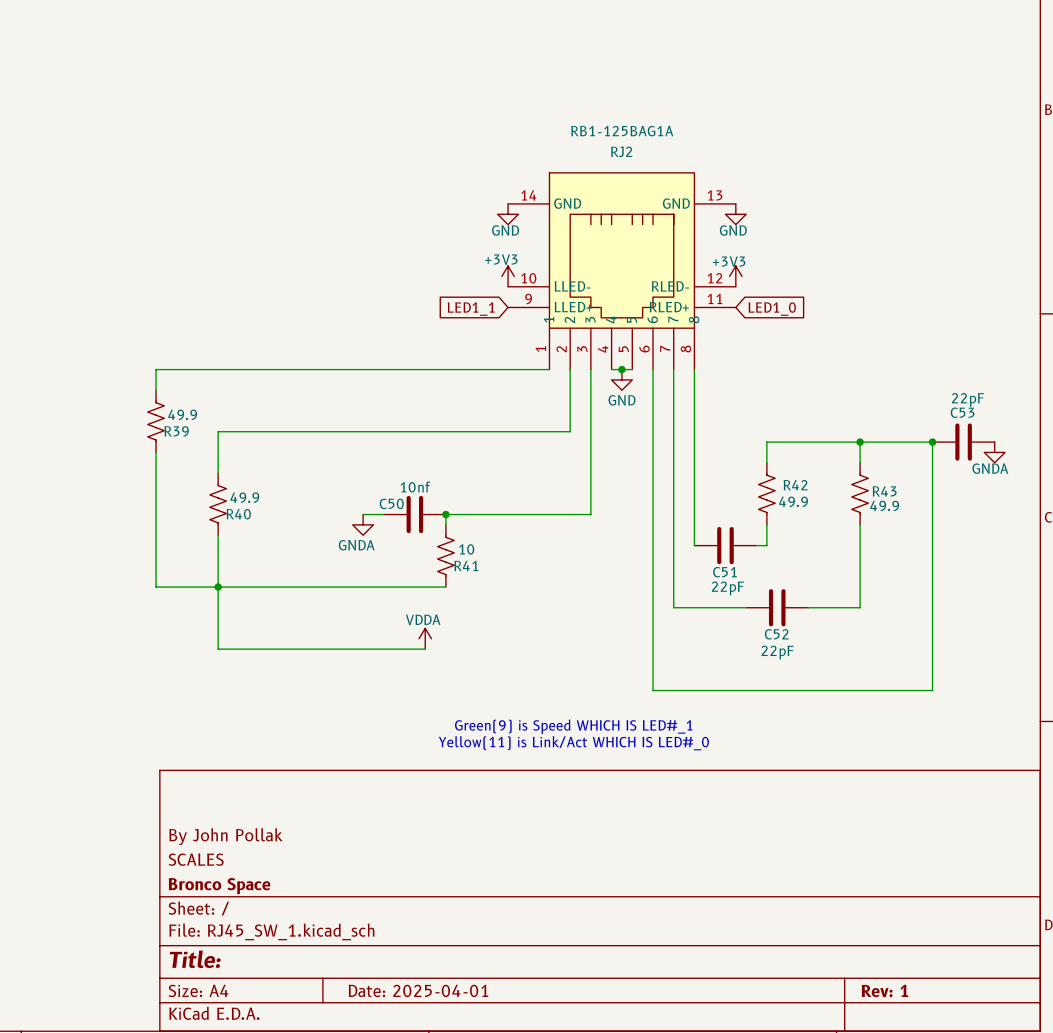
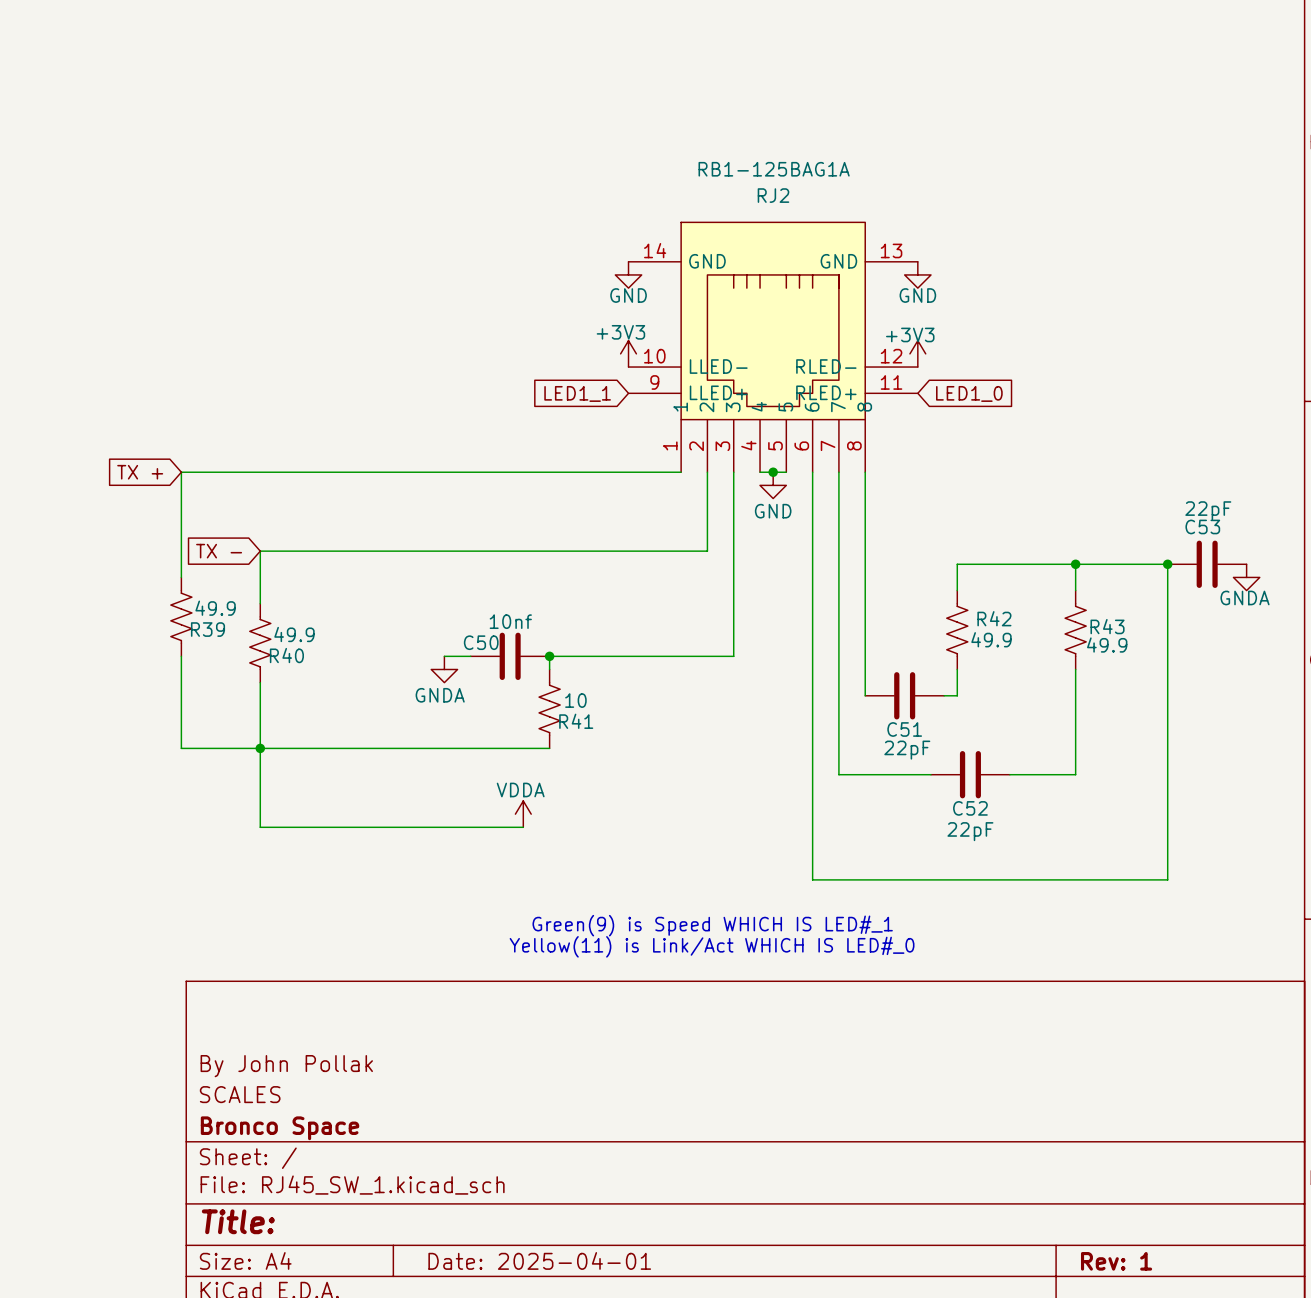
global label: none -> TX + (140, 472)
R39 position: (156, 421) -> (181, 616)
global label: none -> TX - (219, 551)

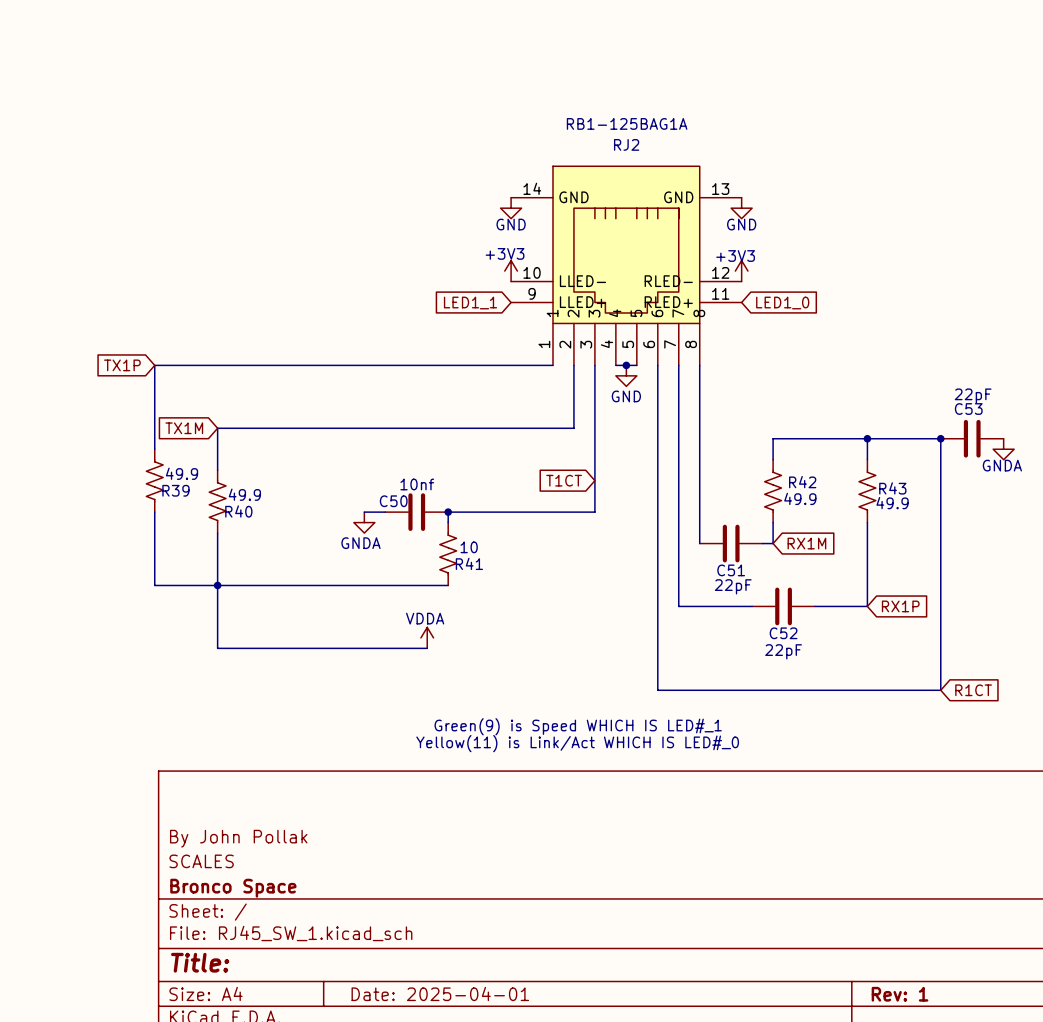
global label: TX + (140, 472) -> TX1P (122, 365)
global label: TX - (219, 551) -> TX1M (184, 428)
global label: none -> T1CT (564, 480)
global label: none -> RX1M (806, 543)
global label: none -> RX1P (900, 606)
global label: none -> R1CT (973, 690)

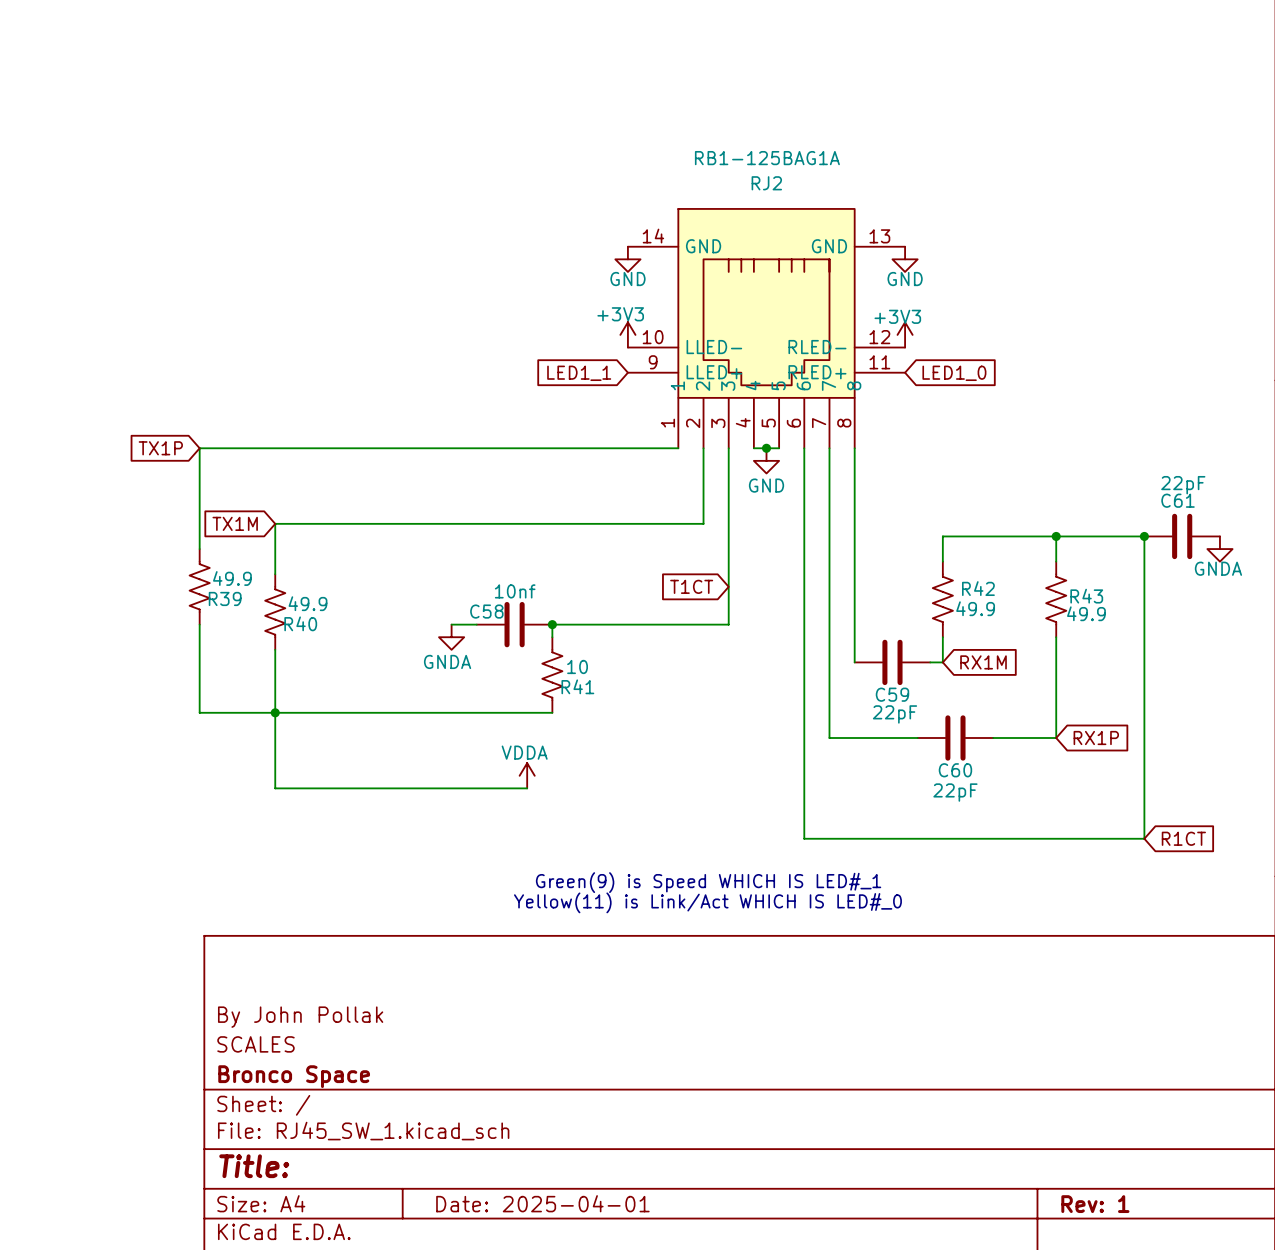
C53 name: C53 (968, 409) -> C61 (1178, 500)
C50 name: C50 (393, 501) -> C58 (486, 611)
C51 name: C51 (731, 570) -> C59 (892, 694)
C52 name: C52 (783, 633) -> C60 (955, 770)

